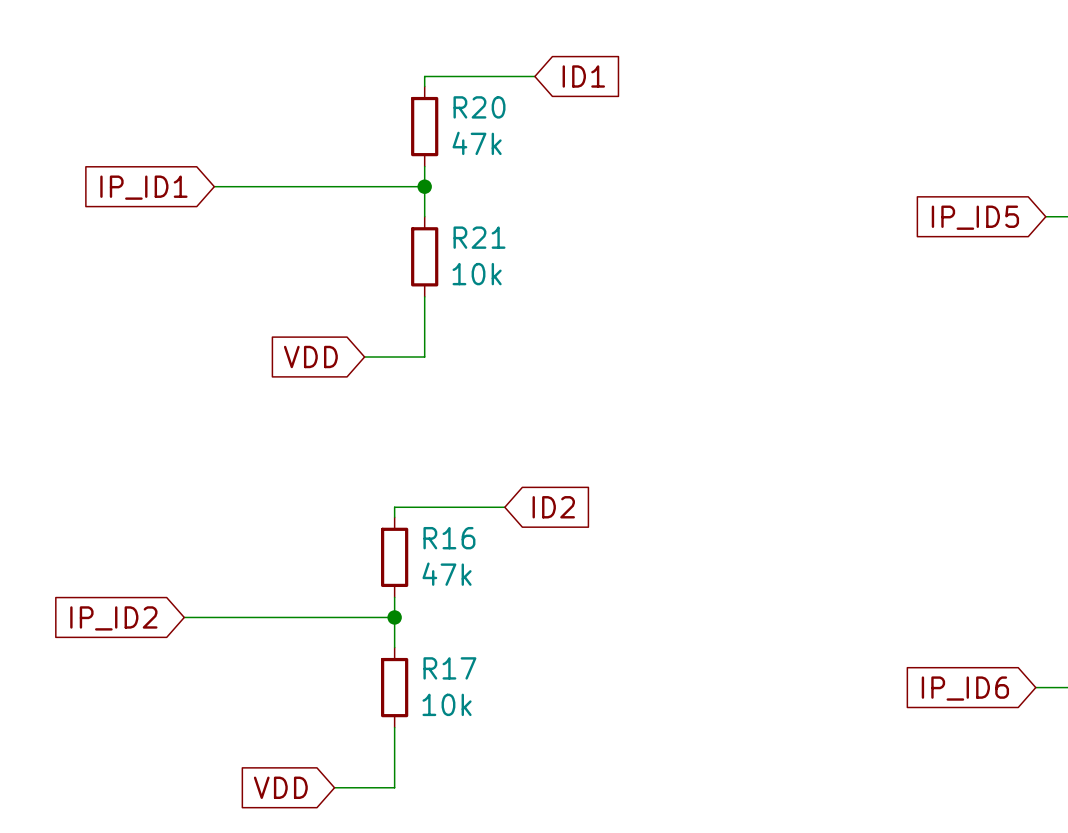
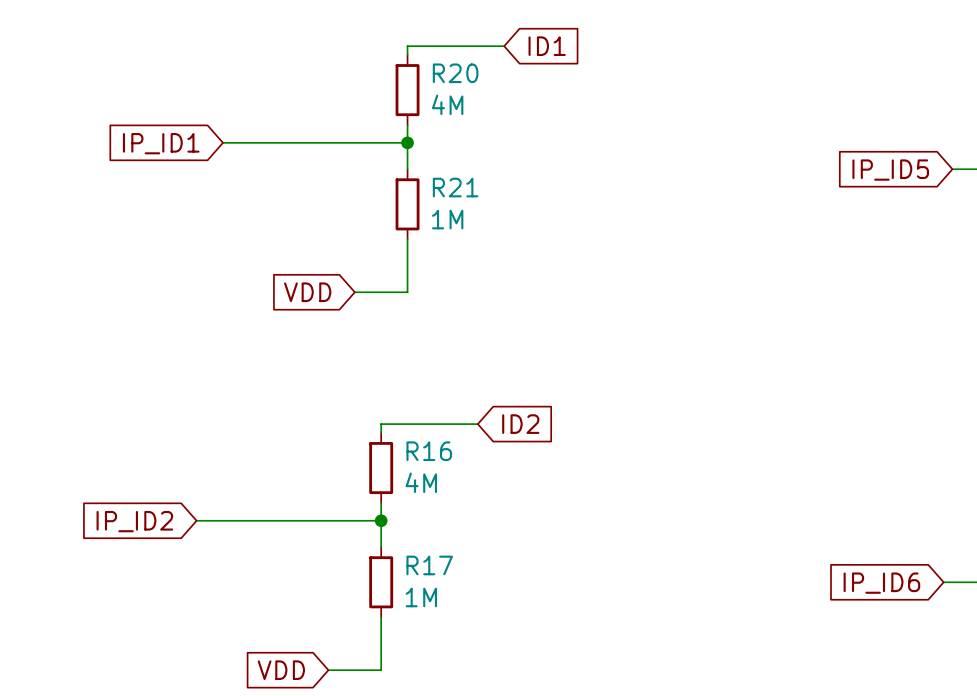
R20 value: 47k (477, 143) -> 4M (447, 104)
R21 value: 10k (477, 274) -> 1M (447, 219)
R16 value: 47k (447, 574) -> 4M (421, 482)
R17 value: 10k (447, 704) -> 1M (421, 597)

